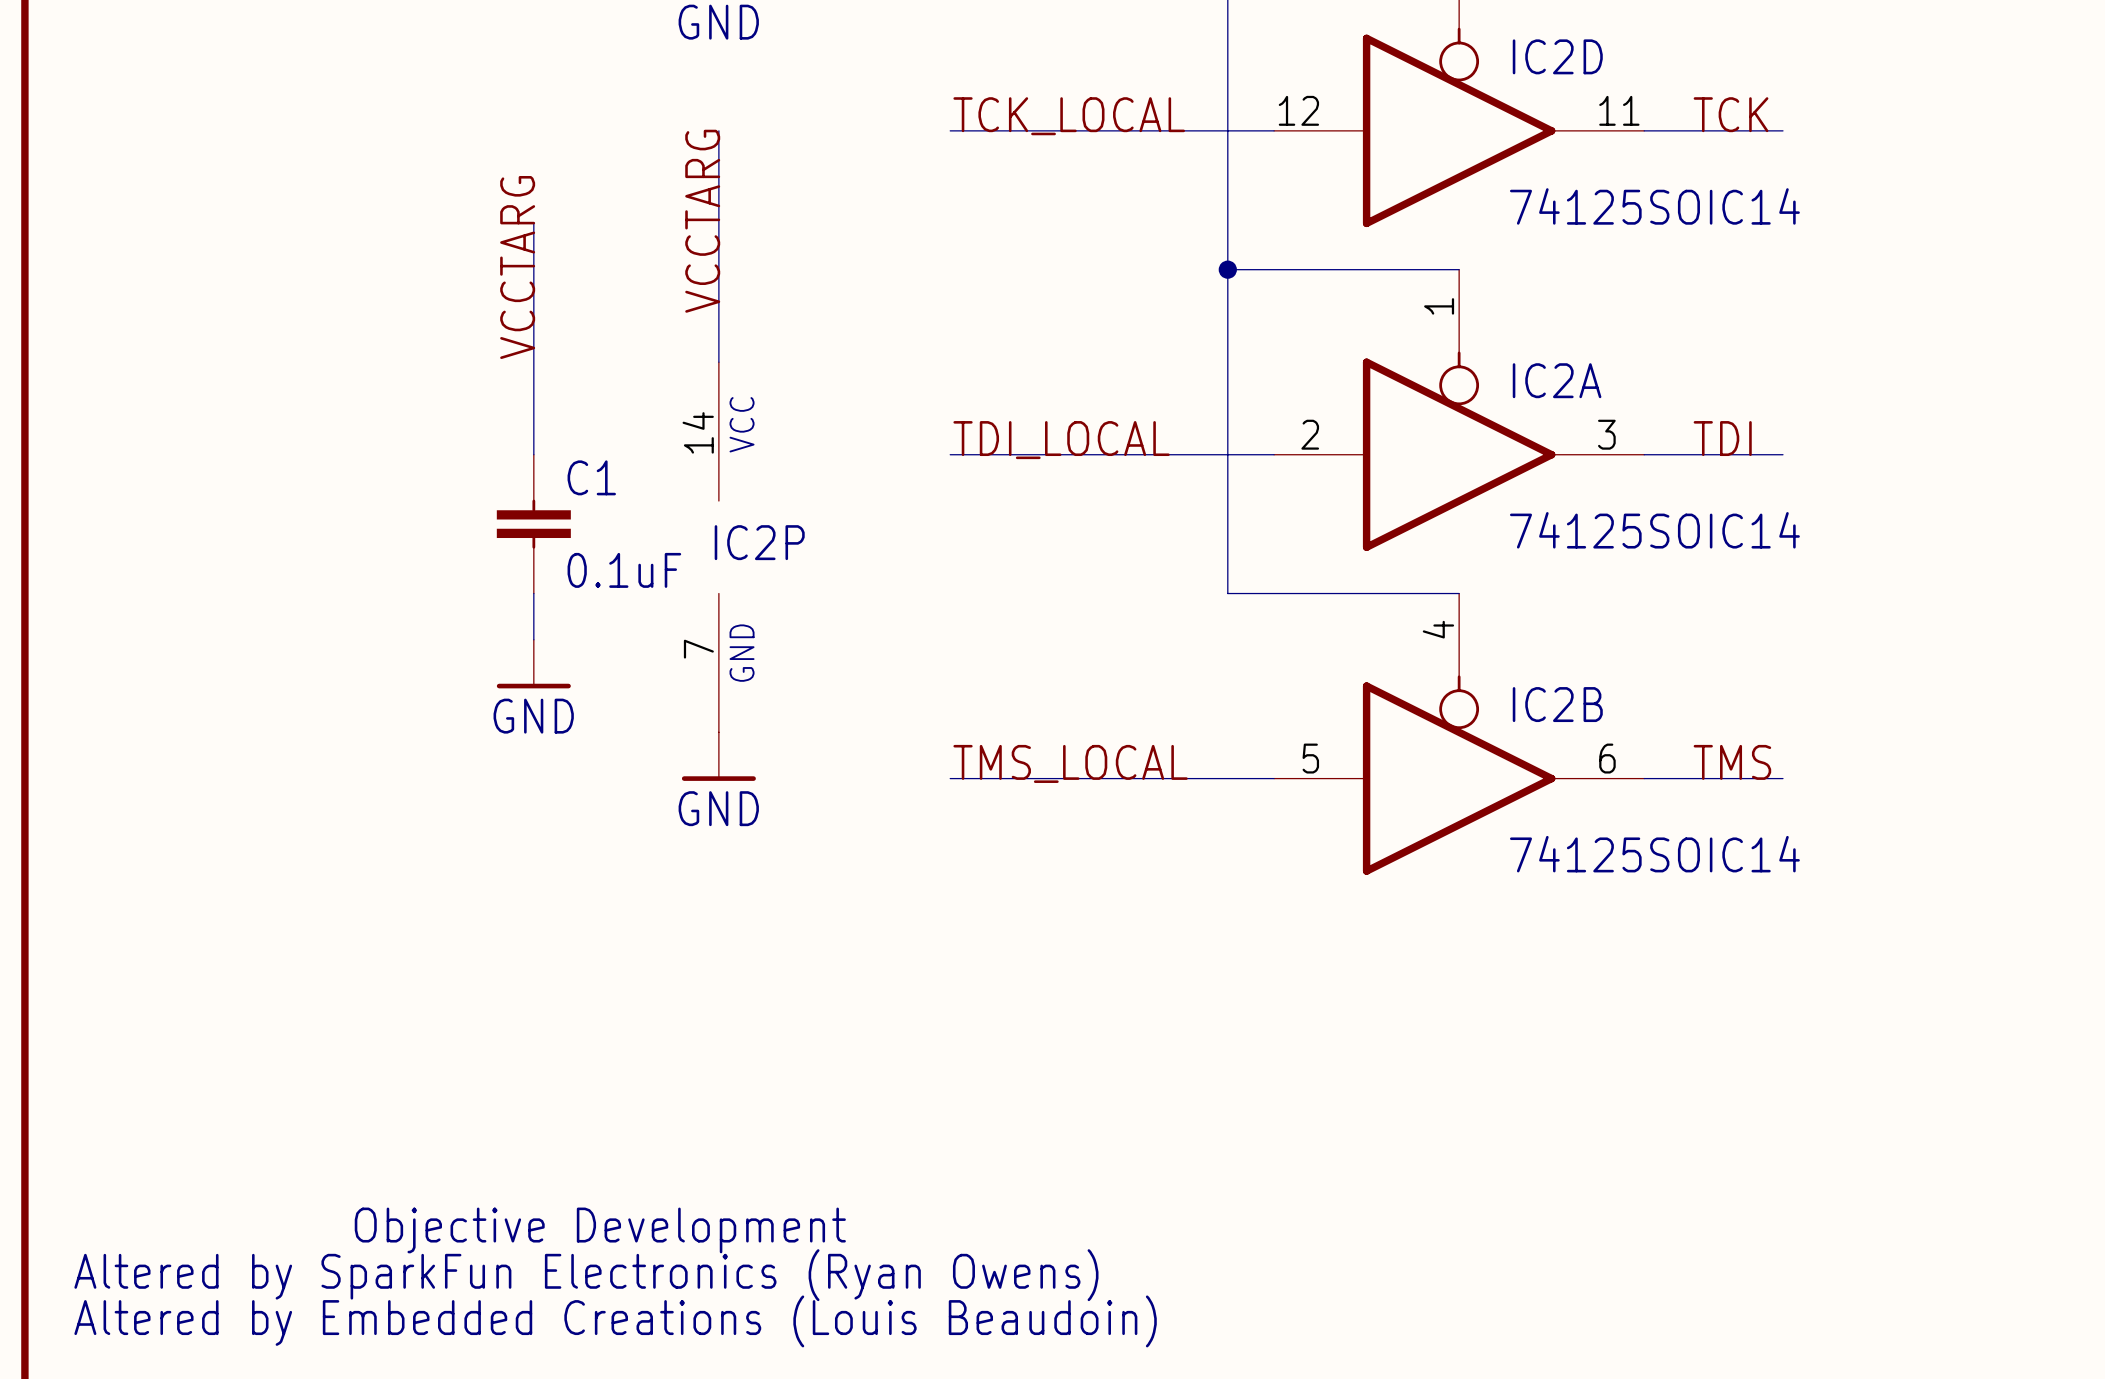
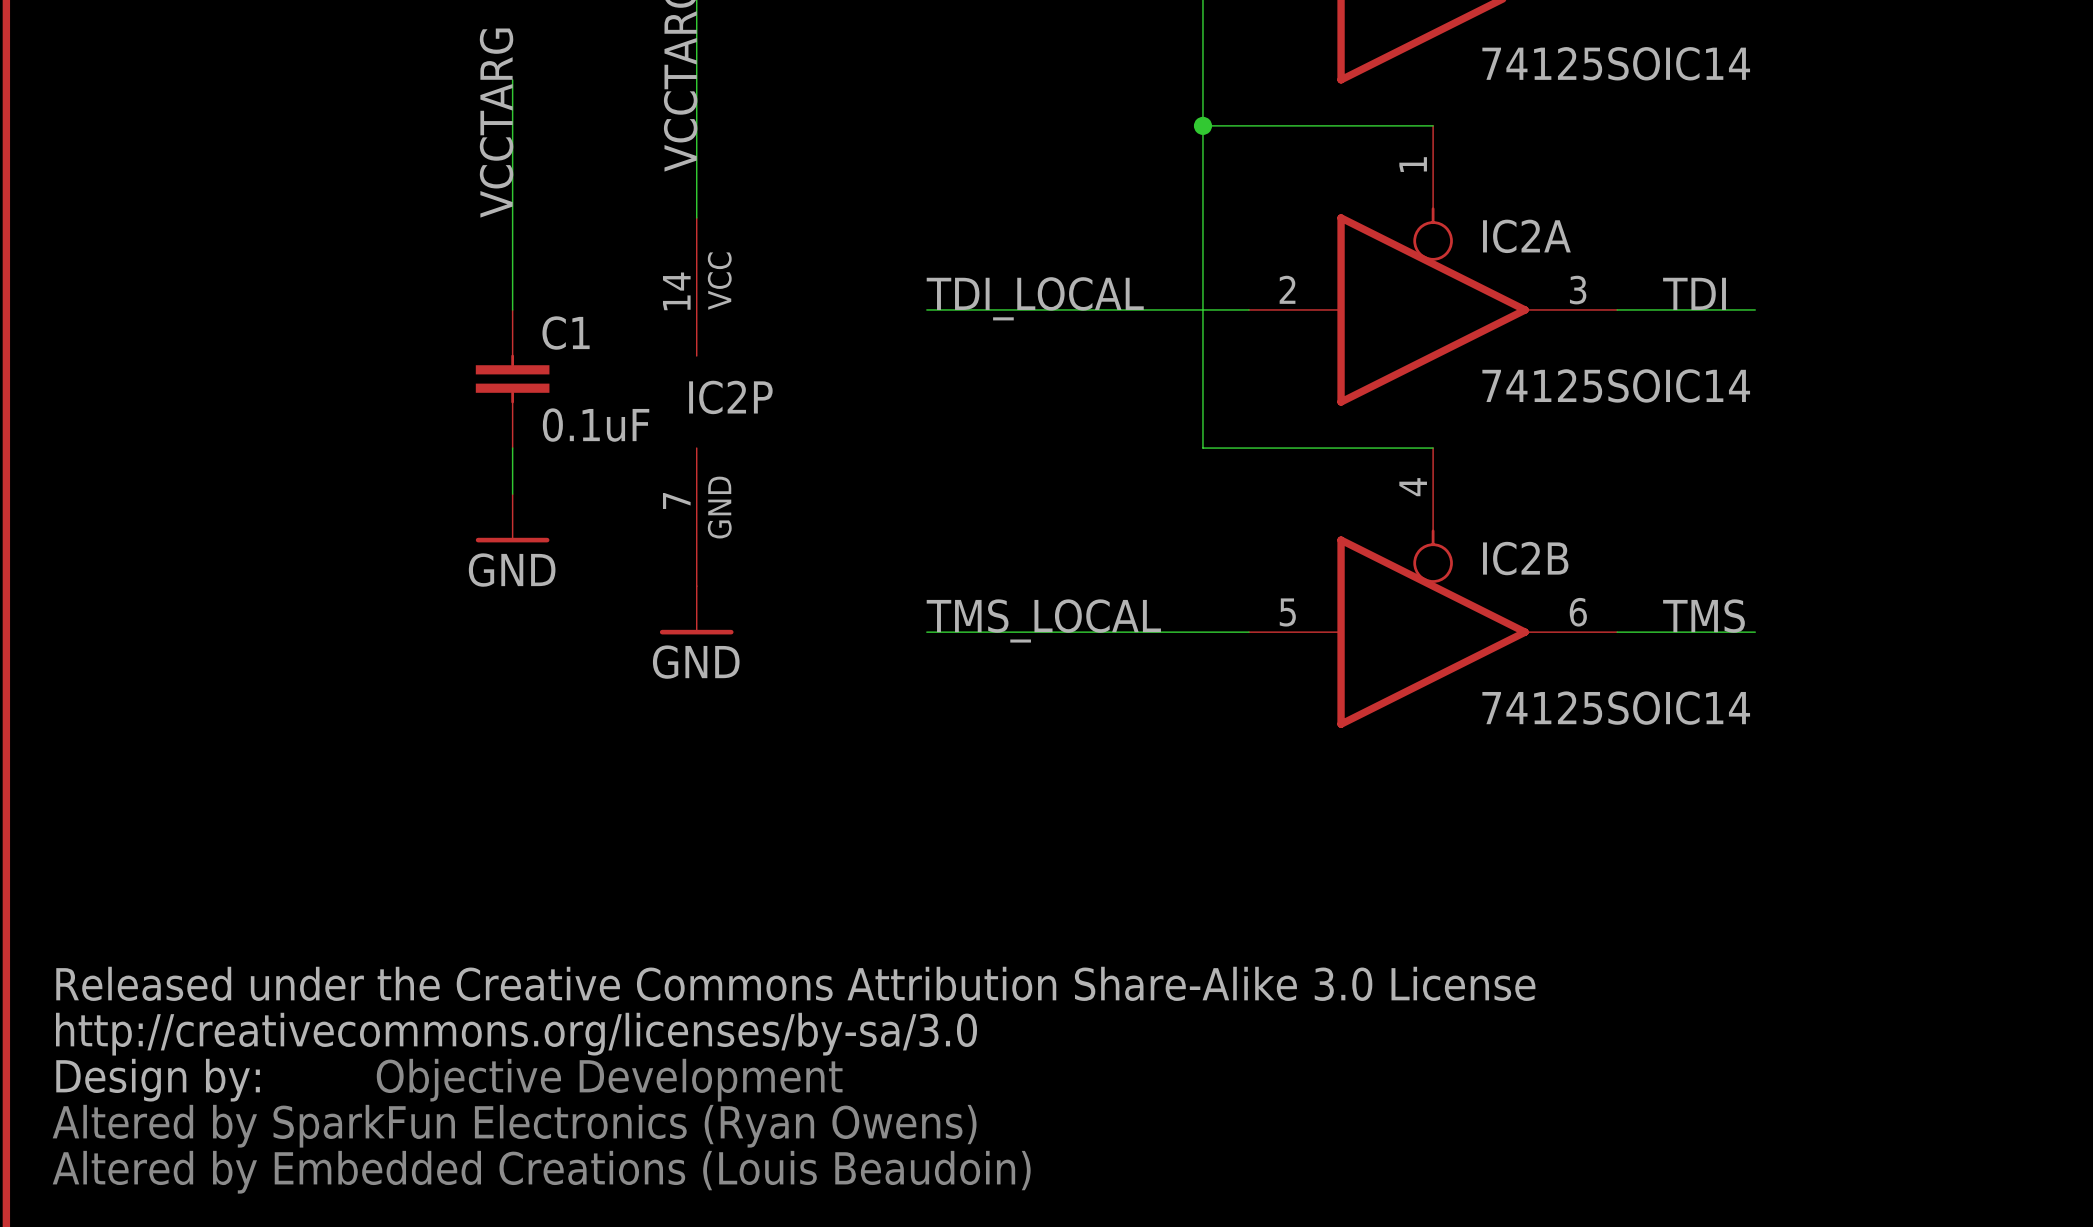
part: none -> (795, 1034)
text position: Objective Development (600, 1230) -> Objective Development (609, 1080)

